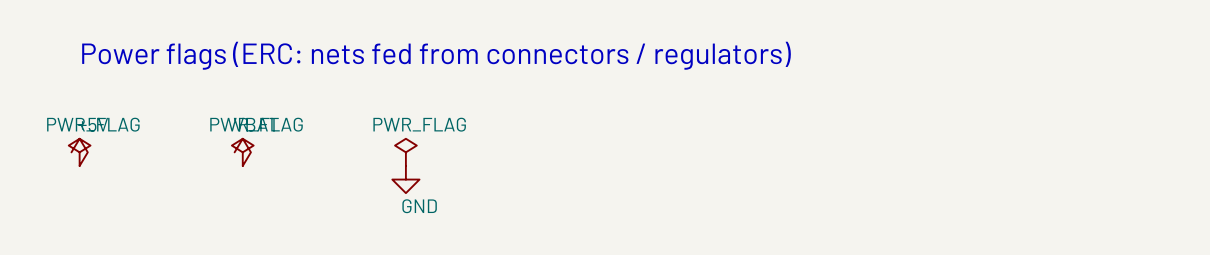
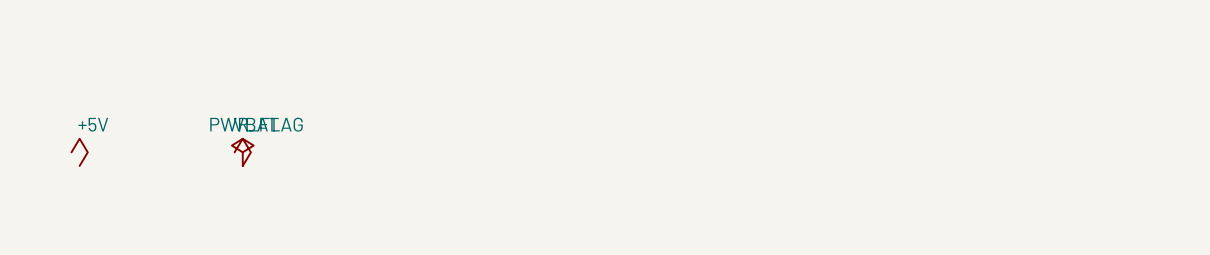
text: Power flags (ERC: nets fed from connectors / regulators) (436, 55) -> none
power symbol: PWR_FLAG (79, 152) -> none
power symbol: PWR_FLAG (405, 152) -> none
power symbol: GND (405, 179) -> none

